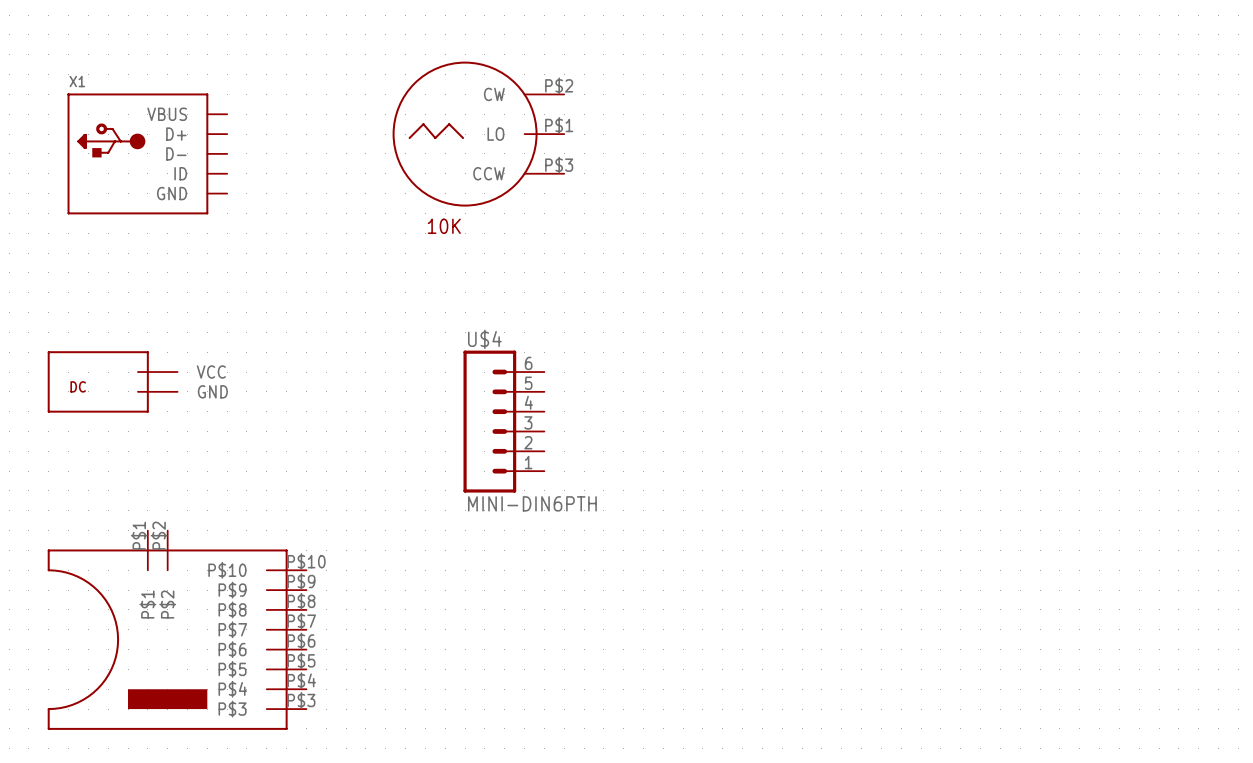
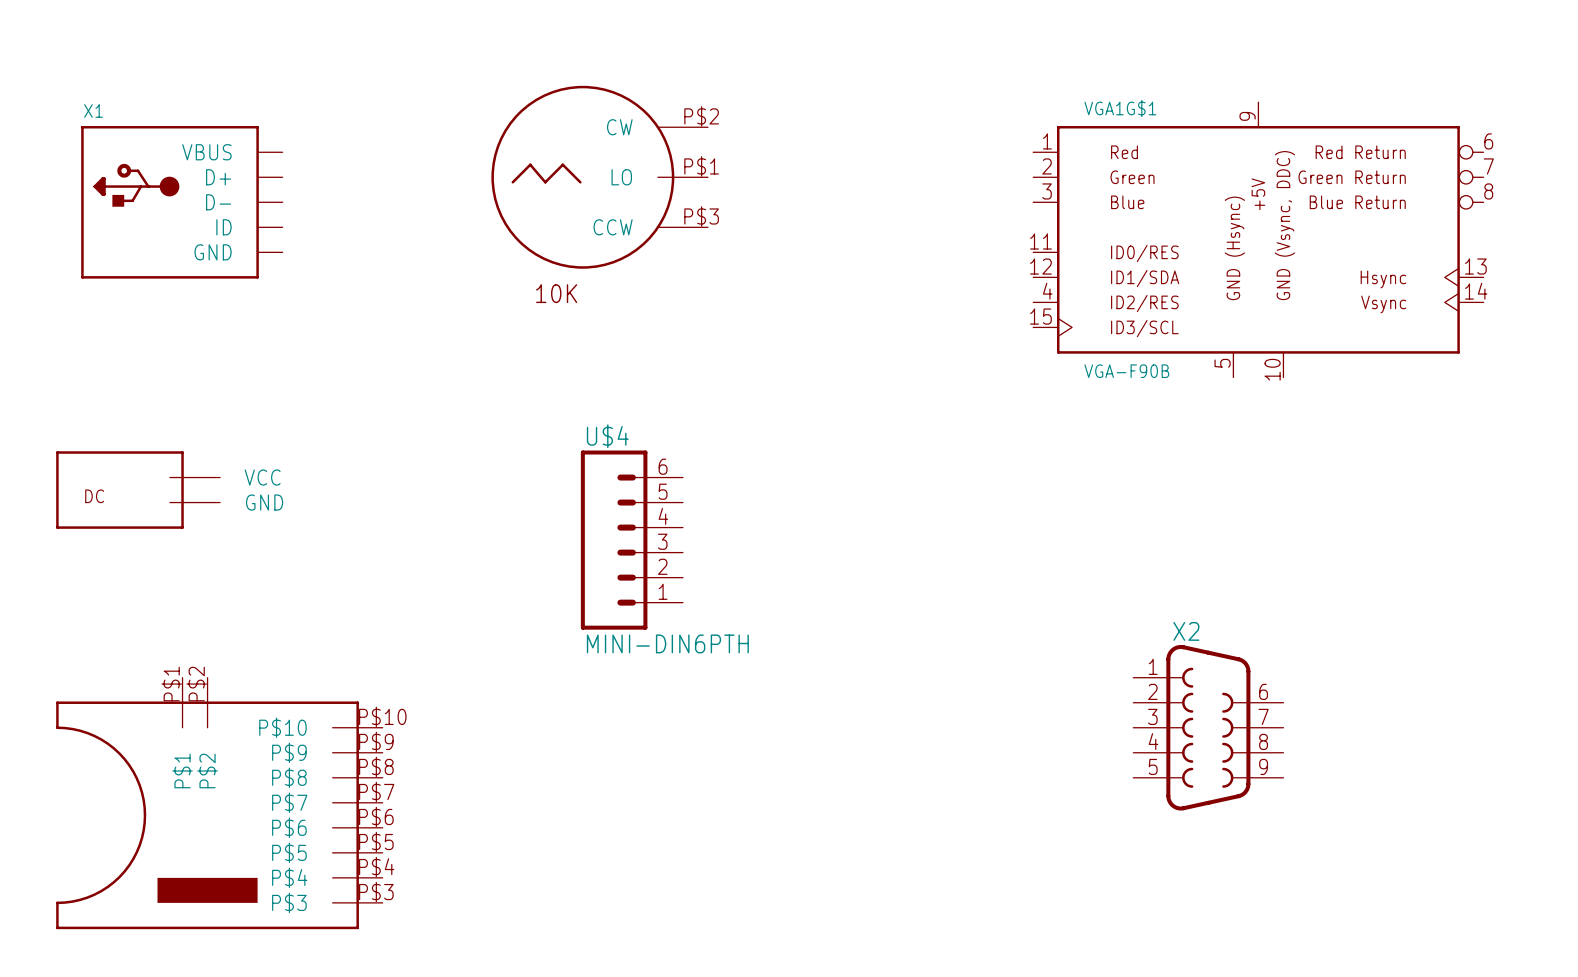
VGA1G$1: none -> VGA-F90B (1258, 239)
X2: none -> (1208, 727)

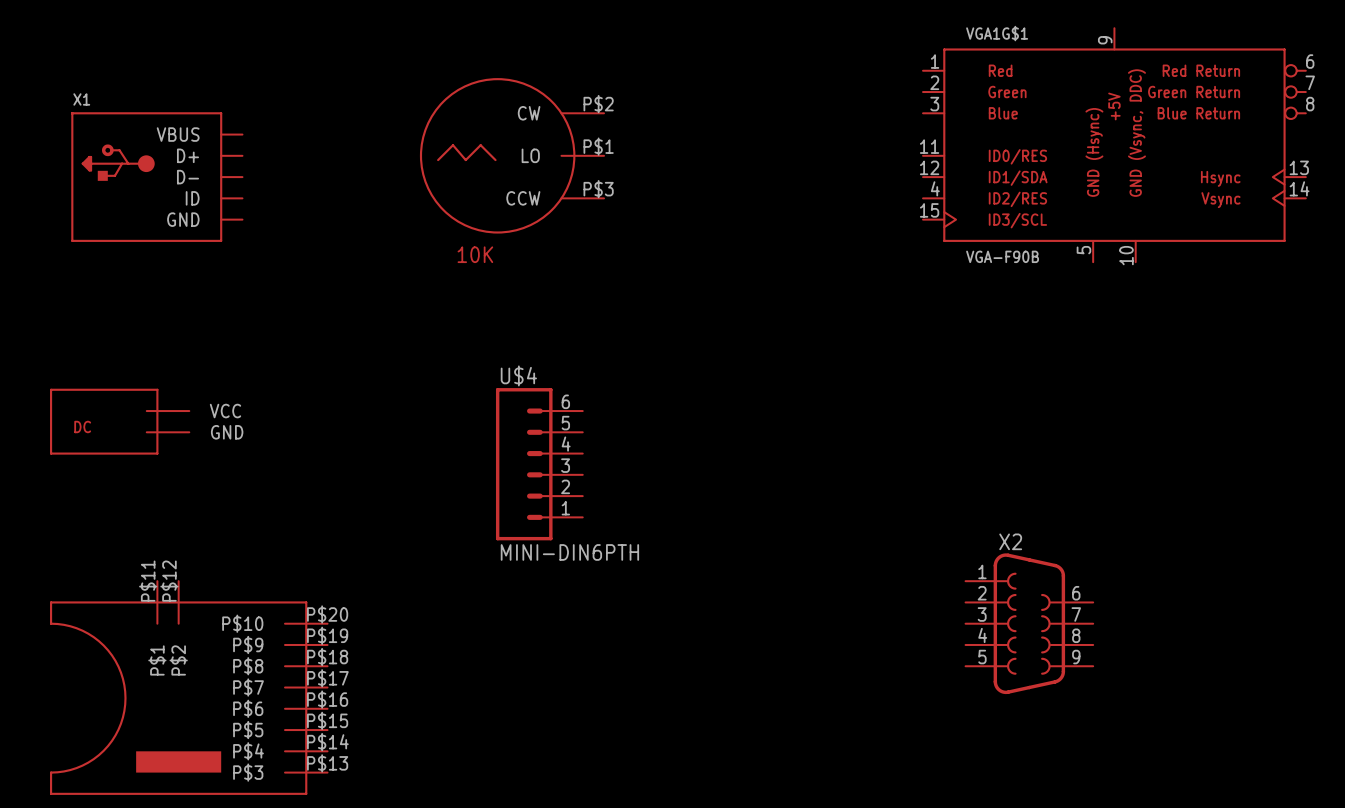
VGA1G$1 position: (1258, 239) -> (1114, 145)
part symbol: [56, 677, 383, 930] -> [49, 581, 328, 795]

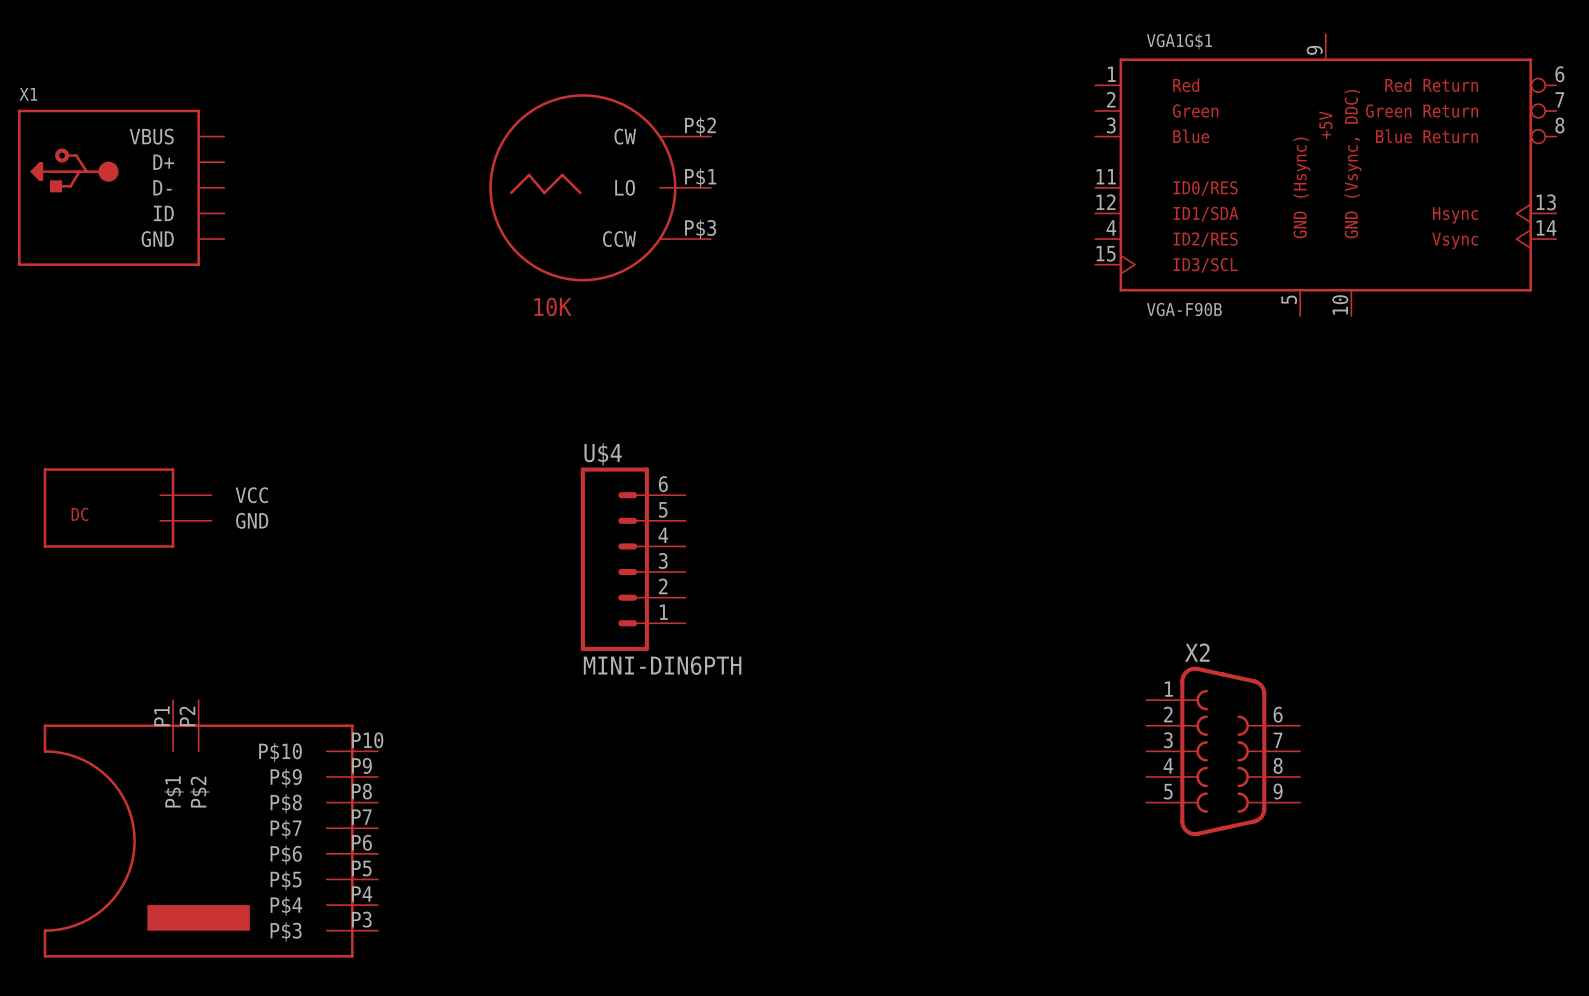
X1 position: (156, 177) -> (120, 187)
part symbol: [49, 581, 328, 795] -> [43, 700, 378, 958]

